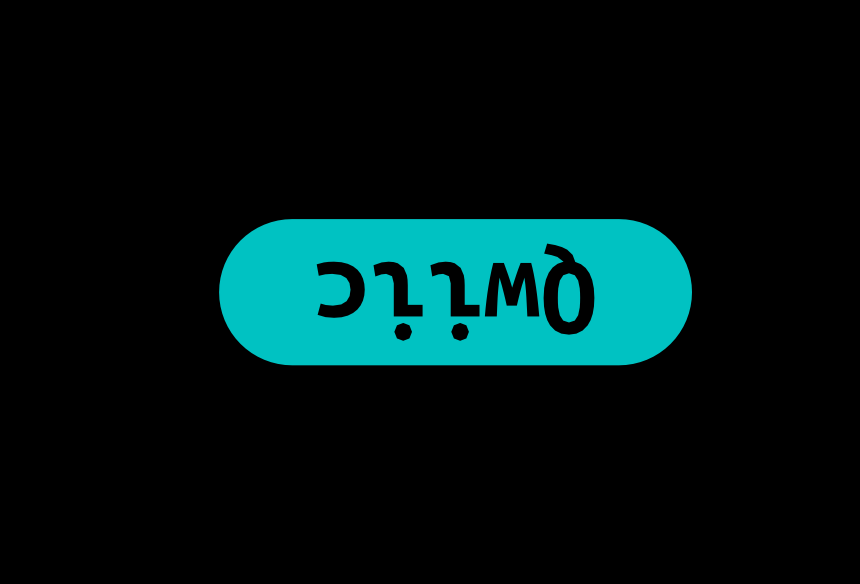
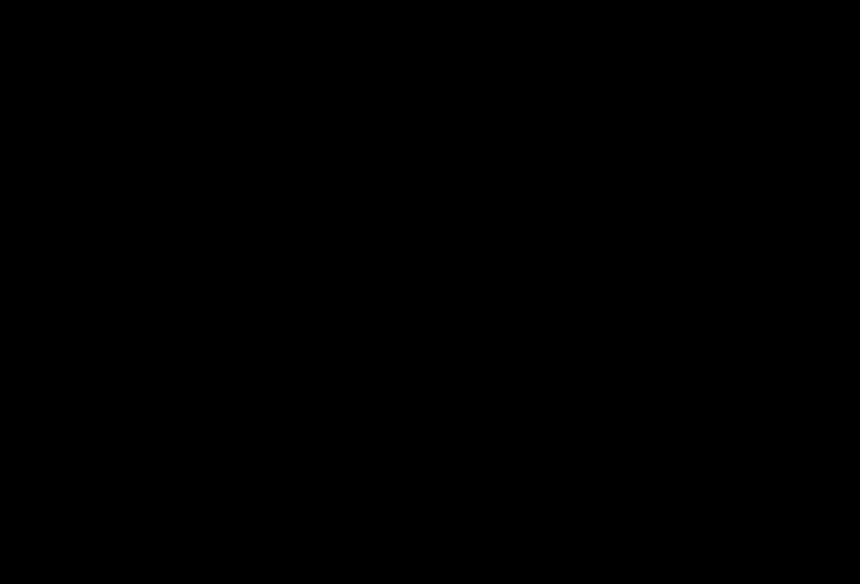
drawing: [219, 219, 693, 366] -> none

